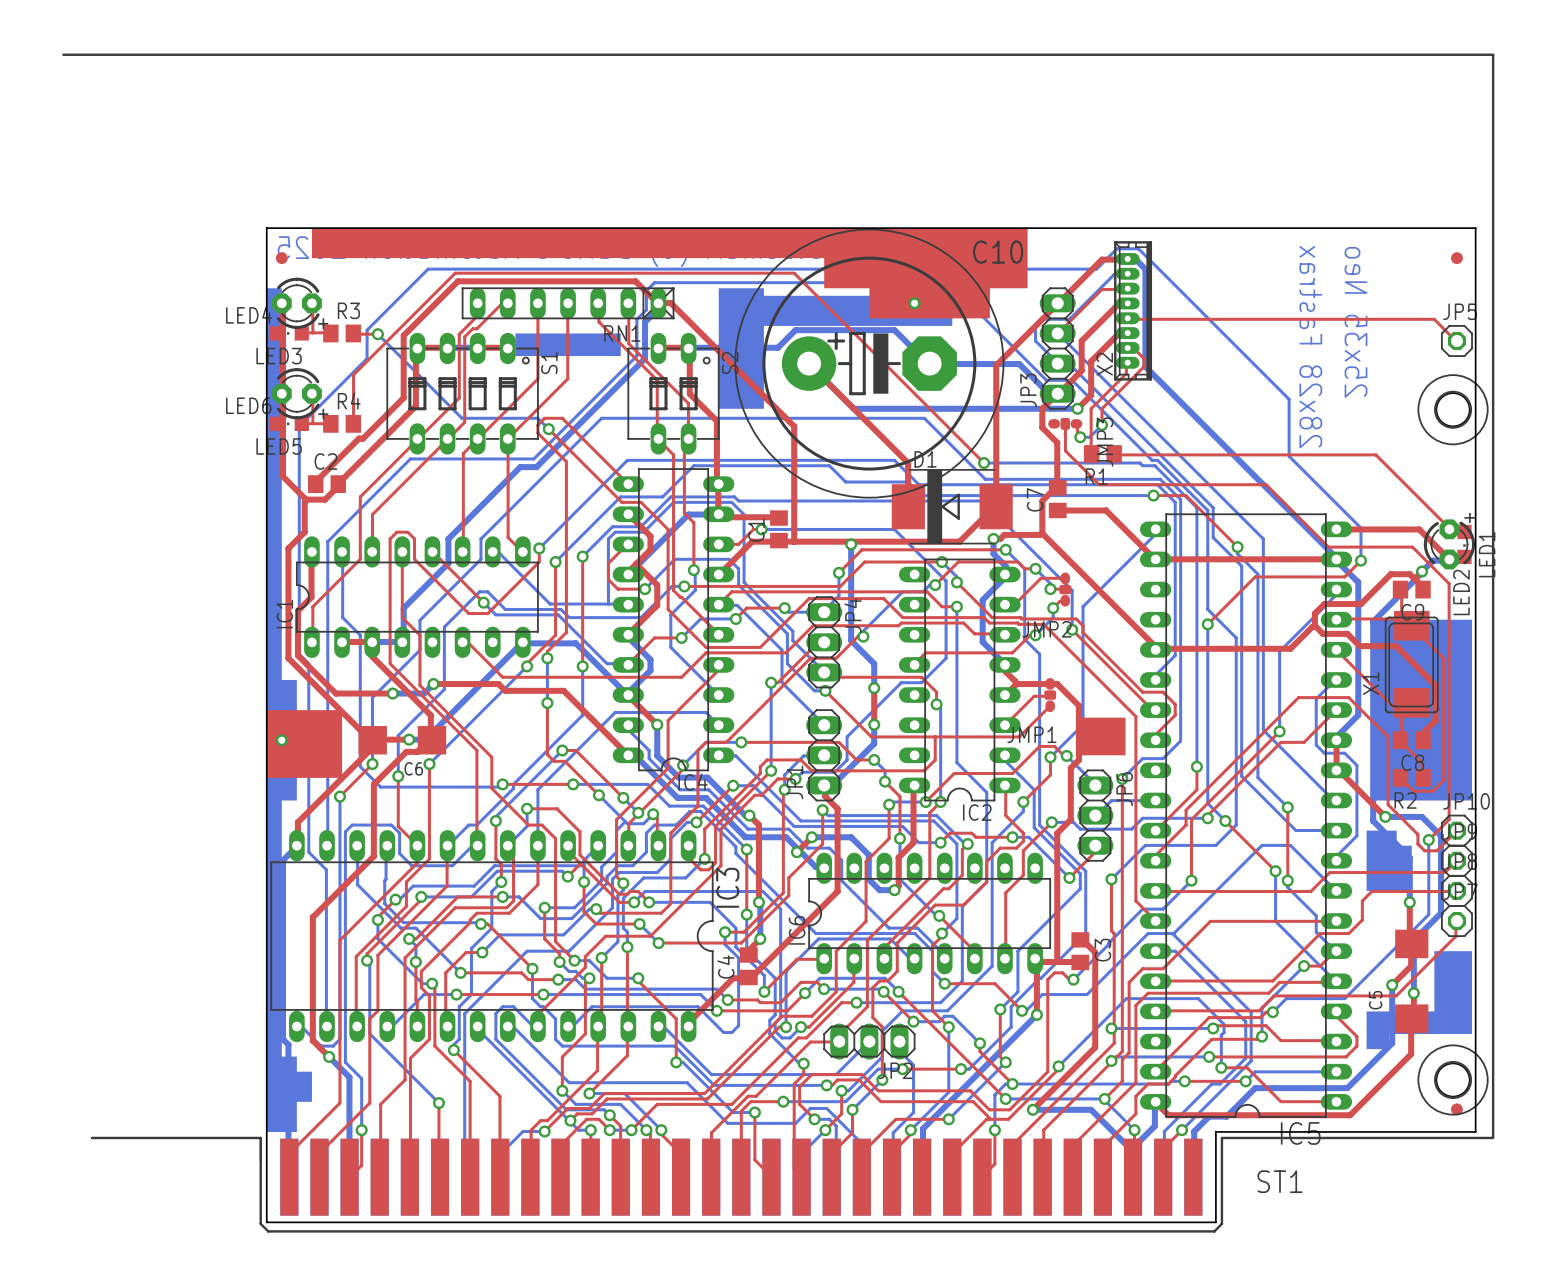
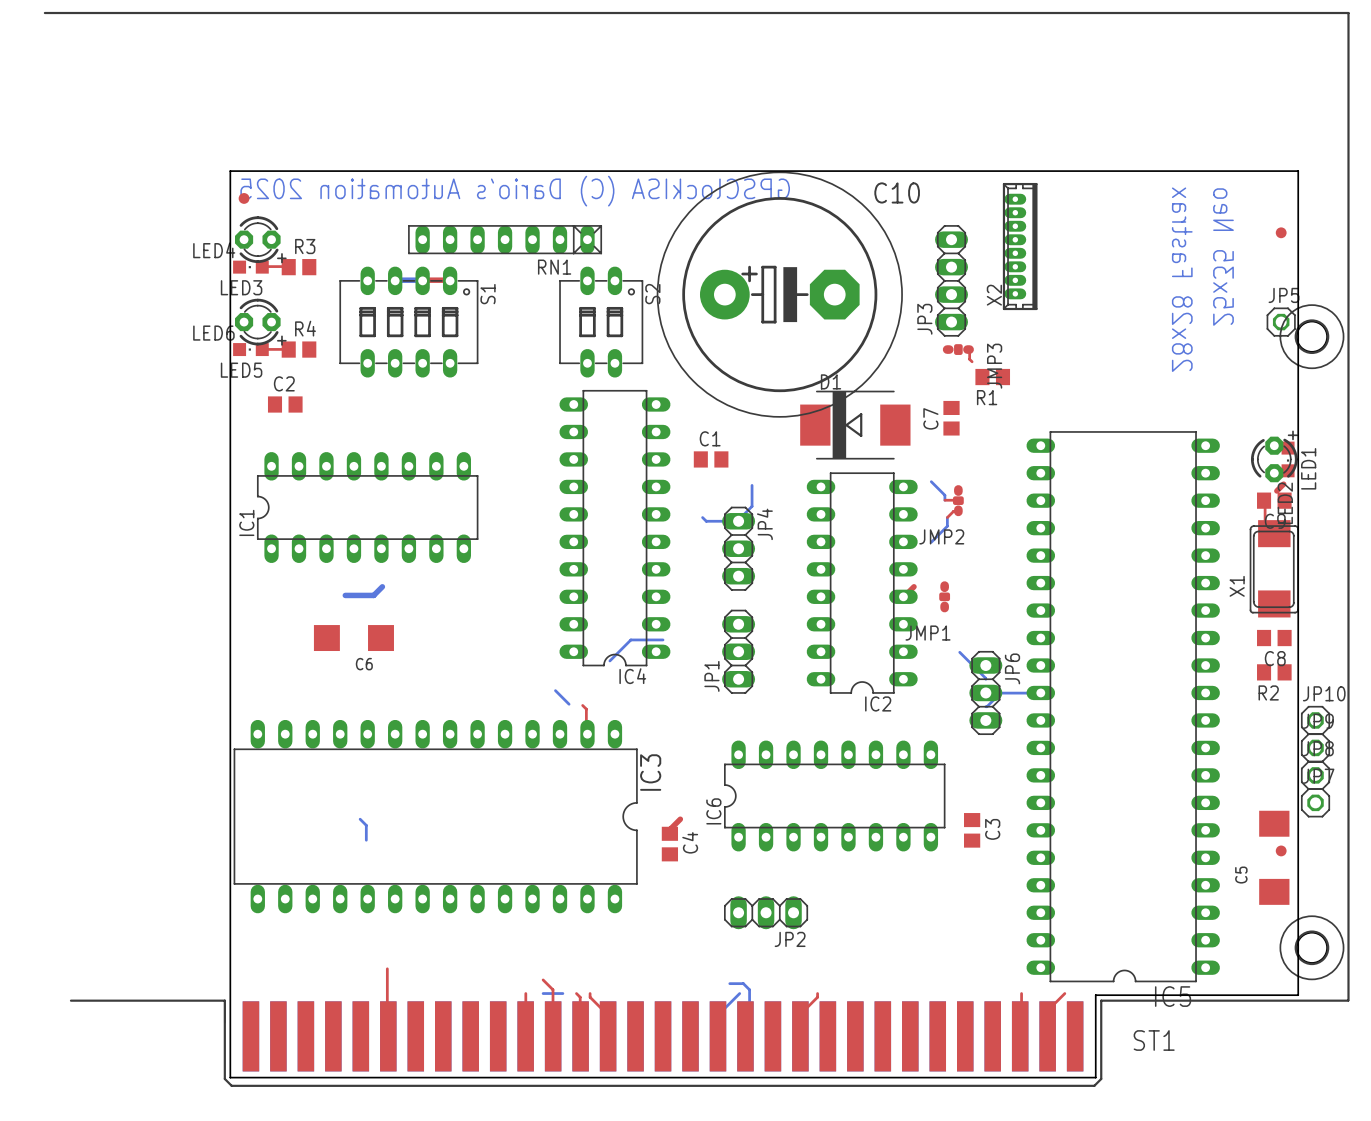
drawing: [311, 228, 1028, 409] -> none
board edge: (1437, 228) (1475, 228) (1475, 1131) (1437, 1131) -> (1298, 171) (1298, 995)
top track: (1127, 258) (1102, 259) (996, 365) (996, 506) (959, 541) (752, 541) (718, 574) -> none
bottom track: (1127, 258) (1135, 259) (1145, 269) (1145, 366) (1335, 556) (1336, 560) (1358, 582) (1358, 715) (1336, 736) (1336, 740) -> none
part position: (1456, 258) -> (1281, 232)
bottom track: (1127, 273) (1114, 274) (1069, 319) (1043, 319) (1035, 327) (1035, 340) (1057, 363) (1069, 364) (1213, 507) (1213, 537) (1241, 566) (1241, 776) (1295, 830) (1336, 830) -> none
drawing: [266, 288, 343, 1132] -> none
top track: (1127, 288) (1102, 289) (1057, 333) -> none
top track: (281, 303) (283, 476) (306, 499) -> none
top track: (311, 303) (312, 332) -> none
top track: (477, 303) (476, 316) (459, 334) (459, 397) (360, 496) (360, 559) (312, 606) (311, 642) -> none
top track: (507, 303) (501, 304) (476, 328) (472, 328) (464, 336) (464, 422) (372, 514) (372, 551) -> none
top track: (537, 303) (537, 378) (463, 453) (462, 551) -> none
top track: (568, 303) (567, 378) (507, 438) (508, 537) (522, 551) -> none
top track: (598, 303) (598, 322) (657, 380) (657, 438) (673, 454) (673, 590) (718, 634) -> none
top track: (628, 303) (628, 343) (688, 403) (688, 438) (684, 444) (684, 513) (693, 522) (693, 570) -> none
bottom track: (658, 303) (657, 309) (645, 322) (645, 358) (536, 467) (520, 467) (448, 538) (448, 563) (403, 608) (402, 642) (372, 642) -> none
via: (914, 303) -> none
top track: (1127, 303) (1118, 304) (1081, 340) (1081, 370) (1042, 408) (1042, 427) (1057, 442) (1057, 487) (1042, 500) (1042, 533) -> none
top track: (1127, 318) (1434, 319) (1456, 340) -> none
top track: (353, 333) (377, 334) -> none
drawing: [515, 333, 621, 357] -> none
bottom track: (1057, 333) (1263, 538) (1263, 730) (1332, 799) (1336, 800) -> none
top track: (1127, 333) (1118, 334) (1091, 361) (1091, 395) (1077, 408) -> none
bottom track: (377, 334) (462, 418) (537, 418) (548, 429) -> none
via: (377, 334) -> none
JP5 position: (1456, 340) -> (1281, 322)
top track: (1127, 347) (1134, 349) (1144, 358) (1144, 366) (1102, 408) (1102, 425) -> none
top track: (447, 348) (417, 348) (415, 406) (337, 484) (337, 487) (325, 499) (306, 499) -> none
top track: (658, 348) (688, 347) (689, 393) (716, 420) (718, 514) (722, 517) (778, 518) -> none
bottom track: (688, 348) (777, 347) (795, 330) (894, 330) (929, 364) (1019, 364) (1047, 392) (1057, 393) -> none
top track: (1127, 362) (1126, 373) (1091, 408) (1091, 453) -> none
top track: (809, 363) (908, 463) (908, 506) -> none
bottom track: (809, 363) (853, 408) (1077, 408) -> none
top track: (311, 393) (312, 423) -> none
via: (1077, 408) -> none
top track: (353, 423) (353, 374) (455, 273) (794, 273) (984, 463) -> none
top track: (1065, 423) (1065, 450) (1099, 484) (1266, 484) (1328, 547) (1412, 547) (1449, 583) (1449, 819) (1428, 839) -> none
bottom track: (1102, 425) (1089, 437) (1080, 437) -> none
via: (1102, 425) -> none
top track: (548, 429) (622, 502) (640, 502) (668, 529) (668, 609) (706, 647) (760, 647) (809, 598) (883, 598) (902, 617) (984, 617) (989, 623) (1043, 624) (1135, 716) (1135, 901) (1155, 921) -> none
via: (548, 429) -> none
via: (1080, 437) -> none
top track: (1114, 453) (1375, 454) (1449, 529) -> none
bottom track: (984, 463) (1139, 463) (1142, 465) (1154, 465) (1196, 507) (1196, 766) -> none
via: (984, 463) -> none
top track: (315, 484) (316, 480) (358, 438) (363, 438) (403, 397) (403, 335) (457, 281) (635, 281) (657, 303) (670, 303) (794, 426) (794, 541) -> none
top track: (628, 484) (562, 418) (544, 418) (537, 425) (537, 433) (566, 461) (566, 632) (547, 651) (547, 658) -> none
top track: (1153, 495) (1186, 495) (1237, 547) -> none
bottom track: (1153, 495) (921, 495) (908, 482) (845, 482) (829, 465) (693, 465) (662, 496) (620, 496) (555, 562) -> none
via: (1153, 495) -> none
top track: (306, 499) (304, 532) (288, 548) (288, 658) (369, 739) (372, 740) -> none
top track: (1057, 510) (1106, 510) (1155, 559) (1336, 559) -> none
top track: (628, 514) (650, 536) (650, 549) (628, 571) (628, 574) -> none
bottom track: (718, 514) (688, 514) (628, 574) -> none
top track: (761, 529) (753, 529) (738, 544) (718, 544) -> none
bottom track: (761, 529) (894, 529) (946, 581) (946, 658) (921, 682) (901, 682) (847, 736) (847, 759) (834, 772) (802, 772) (795, 778) -> none
via: (761, 529) -> none
C1 rotation: 0° (778, 529) -> 90° clockwise (711, 459)
bottom track: (1155, 529) (1154, 534) (1083, 606) (1083, 724) (1050, 757) -> none
top track: (1336, 529) (1419, 529) (1449, 559) -> none
top track: (1042, 533) (1154, 646) (1155, 649) (1290, 648) (1314, 625) -> none
top track: (1042, 533) (1004, 534) (1000, 538) (993, 538) -> none
bottom track: (993, 538) (993, 553) (1005, 566) (1005, 571) (1004, 578) (982, 599) (982, 642) (1004, 664) -> none
via: (993, 538) -> none
LED2 position: (1449, 541) -> (1274, 456)
top track: (628, 544) (608, 563) (608, 579) (617, 589) (645, 589) -> none
bottom track: (851, 544) (851, 640) (874, 663) (874, 688) -> none
via: (851, 544) -> none
LED1 position: (1464, 544) -> (1288, 459)
bottom track: (1237, 547) (1237, 553) (1257, 574) (1257, 777) (1287, 807) -> none
via: (1237, 547) -> none
top track: (539, 548) (539, 562) (487, 613) (468, 613) (414, 559) (414, 538) (407, 532) (396, 532) (390, 538) (390, 663) (476, 750) (477, 845) -> none
bottom track: (539, 548) (627, 460) (894, 460) (918, 484) (1157, 484) (1175, 502) (1175, 655) (1156, 674) (1155, 679) -> none
via: (539, 548) -> none
top track: (1005, 549) (862, 549) (838, 572) -> none
bottom track: (1005, 549) (1024, 568) (1024, 639) (1039, 654) (1039, 825) (1085, 871) (1085, 933) (1011, 1006) (1011, 1027) (969, 1069) (960, 1069) -> none
via: (1005, 549) -> none
top track: (311, 551) (311, 597) (297, 610) (297, 655) (335, 693) (392, 693) -> none
bottom track: (342, 551) (342, 617) (360, 635) (360, 766) (380, 787) (499, 787) (502, 784) -> none
top track: (402, 551) (402, 617) (419, 635) (419, 685) (491, 757) (491, 788) (528, 825) (542, 825) (555, 838) (555, 941) (574, 960) -> none
top track: (432, 551) (483, 602) -> none
bottom track: (492, 551) (498, 552) (550, 604) (628, 604) -> none
top track: (582, 556) (582, 666) -> none
bottom track: (582, 556) (612, 526) (640, 526) (670, 496) (734, 496) (738, 500) (982, 500) (1072, 590) (1072, 629) -> none
via: (582, 556) -> none
bottom track: (1449, 559) (1432, 560) (1373, 621) (1373, 821) (1409, 857) (1409, 902) -> none
top track: (1360, 560) (1344, 576) (1255, 576) (1207, 624) -> none
bottom track: (1360, 560) (1360, 528) (1289, 456) (1289, 399) (1138, 248) (1116, 248) (1096, 269) (428, 269) (367, 330) (367, 358) (299, 426) (299, 654) (308, 663) (308, 852) (326, 869) (327, 1026) -> none
via: (1360, 560) -> none
top track: (555, 562) (555, 635) (527, 663) (527, 666) -> none
via: (555, 562) -> none
top track: (942, 562) (864, 562) (840, 586) (684, 586) -> none
bottom track: (942, 562) (956, 576) (956, 582) -> none
via: (942, 562) -> none
top track: (636, 564) (657, 585) (657, 605) (628, 634) -> none
top track: (1035, 568) (1024, 568) (1017, 562) (958, 562) (935, 585) -> none
via: (1035, 568) -> none
bottom track: (693, 570) (695, 590) (670, 614) (670, 647) (718, 695) -> none
via: (693, 570) -> none
via: (1422, 571) -> none
via: (838, 572) -> none
top track: (1065, 578) (1040, 578) (1015, 604) (1004, 604) -> none
top track: (956, 582) (992, 617) (1076, 618) (1083, 625) (1083, 632) (1142, 692) (1163, 692) (1175, 704) (1175, 715) (1156, 734) (1155, 740) -> none
via: (956, 582) -> none
bottom track: (935, 585) (929, 585) (923, 591) (902, 591) (863, 631) (863, 636) -> none
via: (935, 585) -> none
bottom track: (684, 586) (672, 586) (640, 617) (569, 617) (560, 609) (505, 609) (487, 591) (479, 591) (444, 627) (444, 689) (398, 735) (398, 776) -> none
via: (684, 586) -> none
bottom track: (645, 589) (674, 559) (729, 559) (738, 568) (738, 585) (787, 633) (787, 663) (814, 690) (825, 690) -> none
via: (645, 589) -> none
via: (1050, 589) -> none
bottom track: (1336, 589) (1335, 595) (1279, 651) (1279, 731) -> none
top track: (1423, 589) (1409, 574) (1390, 574) (1360, 604) (1324, 604) (1314, 613) (1314, 625) -> none
bottom track: (483, 602) (495, 614) (558, 614) (607, 663) (628, 664) -> none
via: (483, 602) -> none
bottom track: (608, 604) (608, 538) (615, 532) (643, 532) (673, 502) (731, 502) (744, 514) (744, 582) (792, 631) (792, 640) (824, 672) -> none
top track: (718, 604) (731, 591) (927, 591) (942, 606) (956, 606) -> none
bottom track: (718, 604) (737, 605) (782, 650) (782, 682) (824, 725) -> none
bottom track: (956, 606) (956, 762) (986, 792) (986, 882) (962, 906) (962, 981) (940, 1002) (856, 1002) -> none
via: (956, 606) -> none
top track: (784, 608) (746, 608) (735, 618) -> none
via: (784, 608) -> none
via: (1053, 608) -> none
bottom track: (735, 618) (700, 618) (681, 637) -> none
via: (735, 618) -> none
IC4 position: (673, 619) -> (614, 528)
top track: (1336, 619) (1396, 618) (1400, 614) (1443, 658) (1443, 780) (1432, 791) (1413, 791) (1400, 777) -> none
drawing: [1374, 619, 1473, 801] -> none
bottom track: (1207, 624) (1207, 803) (1225, 821) -> none
via: (1207, 624) -> none
top track: (1314, 625) (1323, 633) (1347, 633) (1359, 646) (1396, 646) (1435, 685) (1435, 720) (1423, 732) (1423, 740) -> none
top track: (1072, 629) (1152, 709) (1155, 710) -> none
via: (1072, 629) -> none
bottom track: (628, 634) (628, 637) (650, 659) (650, 670) (628, 692) (628, 695) (575, 643) (522, 642) (425, 739) (409, 739) -> none
top track: (1004, 634) (974, 633) (963, 623) (901, 623) (898, 625) (813, 625) (786, 652) (706, 652) (681, 677) (502, 677) (468, 643) (462, 642) -> none
top track: (1035, 635) (1030, 635) (1012, 652) (925, 652) (914, 664) -> none
via: (1035, 635) -> none
top track: (863, 636) (857, 636) (836, 658) (810, 658) (726, 742) (706, 742) (697, 750) (697, 806) (670, 833) (670, 903) (661, 913) (600, 913) (596, 909) -> none
via: (863, 636) -> none
top track: (681, 637) (654, 637) (628, 664) -> none
via: (681, 637) -> none
top track: (342, 642) (372, 642) (372, 656) (430, 715) (431, 740) (428, 741) (417, 751) (406, 751) (373, 784) (373, 856) (312, 917) (312, 1040) (329, 1056) -> none
top track: (824, 642) (817, 643) (777, 682) (771, 682) -> none
top track: (1336, 649) (1400, 713) (1411, 702) (1401, 712) (1401, 739) (1400, 741) (1422, 762) (1423, 777) -> none
bottom track: (547, 658) (547, 703) -> none
via: (547, 658) -> none
top track: (718, 664) (718, 670) (668, 720) (668, 768) (616, 819) (616, 876) (623, 883) -> none
top track: (1004, 664) (1005, 671) (1016, 684) (1057, 684) (1078, 705) (1078, 759) (1070, 768) (1070, 819) (1057, 833) (1057, 962) -> none
bottom track: (527, 666) (429, 764) -> none
via: (527, 666) -> none
bottom track: (582, 666) (582, 715) (513, 784) (513, 788) (476, 825) (468, 825) (447, 845) -> none
via: (582, 666) -> none
top track: (824, 672) (829, 677) (921, 677) (936, 692) (936, 704) -> none
bottom track: (1336, 679) (1316, 698) (1316, 745) (1324, 753) (1344, 753) (1356, 765) (1356, 835) (1336, 856) (1336, 860) -> none
bottom track: (771, 682) (771, 770) -> none
via: (771, 682) -> none
top track: (433, 684) (498, 684) (505, 690) (563, 690) (628, 755) -> none
via: (433, 684) -> none
top track: (874, 688) (874, 724) -> none
via: (874, 688) -> none
top track: (825, 690) (871, 736) (1019, 736) (1050, 706) -> none
via: (825, 690) -> none
via: (392, 693) -> none
top track: (628, 695) (657, 724) -> none
top track: (1050, 695) (1034, 696) (1004, 725) -> none
top track: (547, 703) (547, 754) (554, 761) (565, 761) (598, 795) -> none
via: (547, 703) -> none
bottom track: (936, 704) (940, 708) (940, 802) -> none
via: (936, 704) -> none
top track: (1336, 710) (1304, 742) (1280, 742) (1207, 815) (1207, 818) -> none
drawing: [1080, 717, 1126, 756] -> none
bottom track: (657, 724) (657, 755) (678, 777) (707, 777) (745, 815) (749, 815) -> none
via: (657, 724) -> none
bottom track: (874, 724) (874, 743) (833, 784) (824, 785) -> none
via: (874, 724) -> none
bottom track: (628, 725) (628, 730) (649, 750) (649, 758) (680, 789) (708, 789) (748, 829) (788, 829) (807, 848) (829, 848) (841, 860) (841, 880) (889, 928) (917, 928) (944, 955) (944, 958) -> none
bottom track: (718, 725) (706, 712) (615, 712) (537, 789) (537, 845) -> none
top track: (1279, 731) (1191, 819) (1191, 880) -> none
via: (1279, 731) -> none
top track: (935, 736) (935, 759) (924, 770) (811, 770) (800, 759) (767, 759) (760, 766) (760, 773) (704, 829) (704, 858) -> none
top track: (409, 739) (372, 740) -> none
via: (409, 739) -> none
via: (281, 740) -> none
top track: (372, 740) (372, 747) (297, 822) (296, 845) -> none
top track: (1336, 740) (1336, 770) (1339, 770) (1385, 816) -> none
top track: (741, 742) (838, 742) (856, 759) (874, 759) -> none
via: (741, 742) -> none
top track: (562, 750) (575, 750) (623, 797) -> none
bottom track: (562, 750) (495, 816) (495, 821) -> none
via: (562, 750) -> none
bottom track: (628, 755) (635, 755) (677, 797) (706, 797) (745, 837) (786, 837) (815, 867) (824, 868) -> none
bottom track: (718, 755) (735, 755) (800, 821) (933, 821) (956, 844) (956, 918) (942, 933) -> none
bottom track: (824, 755) (803, 755) (784, 774) (784, 789) -> none
bottom track: (1004, 755) (1005, 761) (1034, 789) (1034, 827) (1080, 873) (1080, 888) (1017, 951) (1017, 991) (1000, 1009) -> none
top track: (1066, 755) (1064, 755) (1054, 746) (1039, 746) (1012, 773) (954, 773) (925, 802) -> none
via: (1066, 755) -> none
top track: (1050, 757) (1050, 774) (1023, 802) -> none
via: (1050, 757) -> none
bottom track: (874, 759) (885, 770) (885, 781) -> none
via: (874, 759) -> none
top track: (372, 764) (339, 796) -> none
bottom track: (372, 764) (372, 697) (419, 650) (419, 620) (480, 559) (480, 538) (601, 418) (924, 418) (985, 479) (1160, 479) (1180, 499) (1180, 741) (1163, 758) (1142, 758) (1122, 778) -> none
via: (372, 764) -> none
top track: (429, 764) (429, 858) (406, 882) (406, 906) (356, 956) (357, 1026) -> none
via: (429, 764) -> none
top track: (683, 765) (683, 769) (628, 823) (628, 845) -> none
via: (683, 765) -> none
top track: (1196, 766) (1196, 789) (1155, 830) -> none
via: (1196, 766) -> none
top track: (771, 770) (715, 826) (715, 863) (708, 869) (700, 869) (689, 858) (688, 845) -> none
via: (771, 770) -> none
top track: (398, 776) (398, 826) (417, 845) (417, 863) (339, 940) (339, 1103) (289, 1153) (289, 1177) -> none
via: (398, 776) -> none
top track: (795, 778) (777, 778) (761, 795) (754, 795) (720, 829) (720, 865) (650, 936) (605, 936) (585, 956) (585, 967) (537, 1014) (537, 1026) -> none
via: (795, 778) -> none
top track: (1122, 778) (1122, 1051) (1043, 1130) (1042, 1177) -> none
via: (1122, 778) -> none
top track: (885, 781) (899, 796) (899, 838) -> none
via: (885, 781) -> none
top track: (502, 784) (573, 784) -> none
via: (502, 784) -> none
bottom track: (573, 784) (647, 784) (669, 806) (703, 806) (746, 849) -> none
via: (573, 784) -> none
top track: (733, 785) (696, 822) -> none
bottom track: (733, 785) (753, 785) (794, 826) (902, 826) (918, 842) (940, 842) -> none
via: (733, 785) -> none
top track: (824, 785) (825, 796) (837, 808) (837, 891) (750, 978) (733, 978) (689, 1021) (688, 1026) -> none
top track: (914, 785) (913, 842) (898, 857) (898, 886) (894, 890) -> none
top track: (1004, 785) (1005, 815) (1023, 833) (1023, 841) (1016, 848) (1000, 848) (986, 861) (986, 882) (963, 905) (935, 905) (897, 943) (897, 971) (887, 981) (879, 981) (872, 987) (872, 1017) (882, 1027) (882, 1079) -> none
top track: (784, 789) (783, 892) (744, 932) (725, 932) -> none
via: (784, 789) -> none
bottom track: (598, 795) (627, 823) (643, 823) (653, 814) -> none
via: (598, 795) -> none
bottom track: (339, 796) (339, 1039) (333, 1046) (320, 1046) (302, 1027) (296, 1026) -> none
via: (339, 796) -> none
via: (623, 797) -> none
bottom track: (925, 802) (891, 802) (889, 804) -> none
via: (925, 802) -> none
top track: (940, 802) (929, 812) (929, 877) (867, 940) (867, 1006) (840, 1033) (838, 1042) (810, 1042) (756, 1096) (748, 1096) (711, 1132) (711, 1177) -> none
via: (940, 802) -> none
bottom track: (1023, 802) (1023, 811) (992, 842) (992, 966) (947, 1010) (902, 1010) (882, 1031) (882, 1056) (848, 1090) (841, 1090) -> none
via: (1023, 802) -> none
top track: (889, 804) (889, 838) (866, 861) (866, 921) (836, 951) (836, 991) (811, 1016) (782, 1016) (704, 1093) (604, 1093) (589, 1108) (567, 1108) (544, 1131) -> none
via: (889, 804) -> none
top track: (1287, 807) (1287, 880) -> none
via: (1287, 807) -> none
top track: (527, 808) (556, 808) (579, 831) (579, 854) (619, 894) (638, 891) (649, 902) -> none
bottom track: (527, 808) (527, 826) (507, 845) -> none
via: (527, 808) -> none
top track: (822, 810) (822, 844) (788, 877) (788, 895) (741, 943) (658, 943) -> none
bottom track: (822, 810) (828, 815) (936, 815) (965, 844) (967, 844) -> none
via: (822, 810) -> none
via: (638, 812) -> none
via: (653, 814) -> none
top track: (749, 815) (758, 825) (758, 902) -> none
via: (749, 815) -> none
JP6 position: (1095, 815) -> (985, 692)
bottom track: (1385, 816) (1422, 816) (1440, 835) (1440, 913) (1413, 940) (1413, 993) -> none
via: (1385, 816) -> none
bottom track: (1207, 818) (1142, 818) (1131, 829) (1080, 829) (1073, 822) (1051, 822) -> none
via: (1207, 818) -> none
top track: (495, 821) (495, 858) (501, 864) (501, 882) -> none
via: (495, 821) -> none
bottom track: (625, 821) (616, 830) (616, 852) (601, 867) (601, 880) (574, 907) (544, 907) -> none
top track: (1225, 821) (1275, 871) -> none
via: (1225, 821) -> none
bottom track: (696, 822) (687, 822) (670, 838) (670, 858) (657, 872) (619, 872) (612, 879) (612, 907) (569, 951) (527, 951) (464, 1013) (464, 1170) (470, 1177) -> none
via: (696, 822) -> none
top track: (1051, 822) (1023, 850) (1023, 875) (1005, 892) (1004, 958) -> none
via: (1051, 822) -> none
drawing: [1366, 830, 1412, 891] -> none
top track: (1456, 830) (1436, 850) (1424, 850) (1417, 844) (1417, 834) (1388, 804) (1388, 736) (1348, 697) (1298, 697) (1186, 810) (1186, 825) (1156, 854) (1155, 860) -> none
top track: (811, 837) (796, 852) -> none
bottom track: (811, 837) (851, 837) (868, 854) (868, 879) (879, 890) (894, 890) -> none
via: (811, 837) -> none
top track: (1012, 837) (975, 837) (971, 833) (950, 833) (940, 842) -> none
bottom track: (1012, 837) (1028, 837) (1069, 877) -> none
via: (1012, 837) -> none
bottom track: (899, 838) (899, 879) (936, 915) (939, 915) -> none
via: (899, 838) -> none
bottom track: (1428, 839) (1428, 914) (1344, 998) (1286, 998) (1272, 1012) -> none
via: (1428, 839) -> none
via: (940, 842) -> none
top track: (967, 844) (962, 849) (962, 875) (948, 888) (943, 888) (885, 947) (884, 958) -> none
via: (967, 844) -> none
bottom track: (296, 845) (283, 860) (283, 1039) (288, 1044) (289, 1177) -> none
bottom track: (327, 845) (327, 541) (410, 458) (533, 458) (636, 355) (636, 319) (646, 309) (646, 290) (654, 282) (948, 282) (1046, 380) (1072, 380) (1152, 460) (1157, 460) (1207, 510) (1207, 609) (1236, 637) (1236, 825) (1215, 845) (1145, 845) (1111, 879) -> none
bottom track: (357, 845) (357, 884) (400, 928) (415, 928) (460, 972) -> none
bottom track: (387, 845) (384, 903) (403, 922) (480, 924) -> none
top track: (447, 845) (447, 886) (377, 955) (377, 1010) (369, 1018) (369, 1103) (319, 1153) (319, 1177) -> none
bottom track: (477, 845) (471, 846) (452, 865) (411, 865) (399, 853) (399, 833) (391, 825) (352, 825) (345, 831) (345, 1062) (361, 1078) (361, 1130) -> none
top track: (507, 845) (513, 852) (513, 901) (506, 907) (455, 907) (405, 957) (405, 1079) (380, 1104) (379, 1177) -> none
top track: (537, 845) (537, 884) (509, 913) (476, 913) (470, 919) (470, 922) (421, 971) (421, 987) (429, 995) (429, 1039) (410, 1058) (409, 1177) -> none
top track: (568, 845) (569, 852) (619, 902) (634, 902) -> none
bottom track: (598, 845) (584, 860) (584, 882) -> none
top track: (1095, 845) (1095, 852) (1069, 877) -> none
top track: (746, 849) (746, 914) -> none
via: (746, 849) -> none
via: (796, 852) -> none
bottom track: (704, 858) (685, 877) (643, 877) (623, 898) (623, 928) (627, 932) (627, 947) -> none
via: (704, 858) -> none
top track: (1456, 860) (1445, 872) (1329, 872) (1310, 891) (1155, 890) -> none
top track: (580, 863) (567, 876) -> none
bottom track: (584, 865) (494, 865) (474, 886) (413, 886) (399, 899) (395, 899) -> none
bottom track: (1275, 871) (1275, 921) (1336, 981) -> none
via: (1275, 871) -> none
bottom track: (567, 876) (562, 871) (497, 871) (471, 896) (421, 896) -> none
via: (567, 876) -> none
via: (1069, 877) -> none
top track: (1111, 879) (1111, 930) (1114, 933) (1114, 1043) (1012, 1145) (1012, 1177) -> none
via: (1111, 879) -> none
bottom track: (1191, 880) (1163, 909) (1142, 909) (1073, 979) -> none
via: (1191, 880) -> none
bottom track: (1287, 880) (1287, 887) (1316, 915) (1316, 932) (1336, 951) -> none
via: (1287, 880) -> none
bottom track: (501, 882) (491, 891) (491, 928) (471, 948) (471, 994) (459, 1006) (459, 1039) (453, 1044) (453, 1050) -> none
via: (501, 882) -> none
top track: (584, 882) (584, 911) (596, 924) (639, 924) -> none
via: (584, 882) -> none
bottom track: (623, 883) (623, 890) (617, 895) (617, 941) (601, 957) -> none
via: (623, 883) -> none
via: (894, 890) -> none
bottom track: (1336, 890) (1290, 845) (1262, 845) (1173, 933) -> none
top track: (1456, 890) (1371, 891) (1362, 901) (1362, 919) (1348, 933) (1320, 933) (1272, 981) (1155, 981) -> none
top track: (421, 896) (421, 899) (367, 953) (367, 960) -> none
via: (421, 896) -> none
top track: (502, 896) (457, 896) (415, 938) (409, 938) -> none
bottom track: (502, 896) (518, 896) (540, 918) (571, 918) (607, 883) (607, 876) (617, 865) (632, 865) (646, 852) (646, 833) (654, 825) (676, 825) (689, 811) (700, 811) (735, 846) (735, 853) (815, 933) (914, 933) (932, 951) (932, 971) (944, 983) -> none
via: (502, 896) -> none
top track: (395, 899) (377, 917) (377, 919) -> none
via: (395, 899) -> none
bottom track: (634, 902) (645, 891) (763, 891) (780, 909) (780, 1017) (775, 1023) (775, 1031) (782, 1037) (790, 1037) (800, 1027) -> none
via: (634, 902) -> none
bottom track: (649, 902) (710, 902) (735, 928) (735, 947) (764, 975) (764, 991) -> none
via: (649, 902) -> none
bottom track: (758, 902) (760, 938) -> none
via: (758, 902) -> none
top track: (1409, 902) (1411, 966) (1392, 985) -> none
via: (1409, 902) -> none
top track: (544, 907) (544, 938) (559, 953) (559, 962) -> none
via: (544, 907) -> none
bottom track: (596, 909) (589, 909) (563, 934) (499, 934) (482, 952) -> none
via: (596, 909) -> none
bottom track: (746, 914) (746, 949) (775, 978) (775, 1014) (769, 1020) (769, 1033) (799, 1063) (803, 1063) -> none
via: (746, 914) -> none
top track: (939, 915) (974, 951) (974, 958) -> none
via: (939, 915) -> none
bottom track: (377, 919) (377, 938) (422, 983) (432, 983) -> none
via: (377, 919) -> none
top track: (1336, 921) (1210, 921) (1163, 968) (1142, 968) (1129, 982) (1129, 1052) (1122, 1059) (1122, 1081) (1104, 1098) -> none
top track: (1456, 921) (1455, 936) (1396, 995) (1274, 995) (1259, 1010) (1155, 1011) -> none
top track: (480, 924) (487, 924) (532, 968) -> none
via: (480, 924) -> none
bottom track: (639, 924) (658, 943) -> none
via: (639, 924) -> none
bottom track: (725, 932) (725, 944) (738, 957) (738, 1025) (731, 1032) (723, 1032) (697, 1006) (592, 1006) (573, 1025) (568, 1026) -> none
via: (725, 932) -> none
top track: (942, 933) (942, 936) (932, 945) (932, 1010) (948, 1027) -> none
via: (942, 933) -> none
bottom track: (1173, 933) (1148, 933) (1087, 994) (1042, 994) (1026, 1010) (1022, 1010) -> none
bottom track: (1173, 933) (1251, 1012) (1251, 1061) (1182, 1130) -> none
via: (409, 938) -> none
via: (760, 938) -> none
top track: (1080, 939) (1095, 952) (1095, 1047) (1032, 1109) -> none
via: (658, 943) -> none
top track: (627, 947) (627, 1055) (589, 1093) -> none
via: (627, 947) -> none
bottom track: (1155, 951) (1175, 951) (1245, 1021) (1245, 1058) (1219, 1084) (1211, 1084) (1164, 1131) (1163, 1177) -> none
top track: (1336, 951) (1320, 966) (1304, 966) -> none
drawing: [1366, 951, 1473, 1050] -> none
top track: (482, 952) (466, 952) (445, 972) (445, 1024) (447, 1026) -> none
via: (482, 952) -> none
top track: (601, 957) (601, 1023) (597, 1027) (597, 1070) (547, 1120) (540, 1120) (531, 1130) (530, 1177) -> none
via: (601, 957) -> none
top track: (824, 958) (796, 959) (764, 991) -> none
top track: (854, 958) (853, 982) (809, 1027) (800, 1027) -> none
bottom track: (914, 958) (909, 957) (890, 938) (818, 938) (786, 971) (786, 1027) -> none
bottom track: (367, 960) (369, 963) (369, 1033) (438, 1103) -> none
via: (367, 960) -> none
bottom track: (574, 960) (589, 960) (607, 978) (638, 978) -> none
via: (574, 960) -> none
top track: (415, 962) (417, 1026) -> none
via: (415, 962) -> none
bottom track: (559, 962) (569, 971) (575, 971) (582, 978) (589, 978) -> none
via: (559, 962) -> none
top track: (1080, 962) (1038, 962) (1035, 958) (1036, 964) (1036, 1014) -> none
C4 name position: C4 (725, 966) -> C4 (690, 842)
bottom track: (1304, 966) (1262, 1008) (1262, 1036) -> none
via: (1304, 966) -> none
bottom track: (532, 968) (532, 998) (555, 1018) (555, 1039) (562, 1046) (674, 1046) (714, 1085) (826, 1085) -> none
via: (532, 968) -> none
top track: (460, 972) (521, 972) (528, 979) (558, 979) -> none
via: (460, 972) -> none
top track: (589, 978) (585, 982) (585, 1033) (562, 1056) (562, 1090) -> none
via: (589, 978) -> none
top track: (638, 978) (638, 981) (676, 1018) (676, 1062) -> none
via: (638, 978) -> none
bottom track: (558, 979) (575, 979) (585, 989) (716, 989) (727, 999) -> none
via: (558, 979) -> none
top track: (1073, 979) (1069, 979) (1062, 972) (1054, 972) (1047, 979) (1047, 1071) (1009, 1109) (989, 1109) (970, 1090) (878, 1090) (862, 1074) (811, 1074) (799, 1086) (799, 1104) (814, 1119) -> none
via: (1073, 979) -> none
top track: (1336, 981) (1279, 982) (1268, 993) (1148, 993) (1135, 1005) (1135, 1082) (1073, 1145) (1072, 1177) -> none
top track: (432, 983) (434, 986) (434, 1046) (470, 1081) (470, 1177) -> none
via: (432, 983) -> none
top track: (944, 983) (994, 983) (1022, 1010) -> none
via: (944, 983) -> none
bottom track: (1392, 985) (1392, 1043) (1347, 1088) (1255, 1088) (1226, 1116) (1209, 1116) (1194, 1131) (1193, 1177) -> none
via: (1392, 985) -> none
top track: (824, 989) (817, 982) (800, 982) (780, 1002) (760, 1002) (757, 999) (727, 999) -> none
bottom track: (824, 989) (880, 989) (883, 991) -> none
via: (824, 989) -> none
via: (764, 991) -> none
top track: (883, 991) (913, 1021) -> none
via: (883, 991) -> none
top track: (898, 991) (1005, 1098) -> none
bottom track: (898, 991) (885, 978) (819, 978) (805, 993) -> none
via: (898, 991) -> none
top track: (805, 993) (787, 1010) (716, 1010) -> none
via: (805, 993) -> none
top track: (1413, 993) (1413, 1016) (1411, 1018) (1411, 1054) (1350, 1115) (1168, 1115) (1155, 1101) -> none
via: (1413, 993) -> none
top track: (456, 994) (543, 994) -> none
bottom track: (456, 994) (424, 994) (392, 1025) (387, 1026) -> none
via: (456, 994) -> none
bottom track: (543, 994) (700, 994) (716, 1010) -> none
via: (543, 994) -> none
via: (727, 999) -> none
top track: (856, 1002) (841, 1002) (806, 1037) (798, 1037) (731, 1104) (657, 1104) (631, 1130) -> none
via: (856, 1002) -> none
top track: (1000, 1009) (1000, 1056) (1005, 1062) -> none
via: (1000, 1009) -> none
via: (716, 1010) -> none
via: (1022, 1010) -> none
top track: (1336, 1011) (1336, 1016) (1356, 1036) (1356, 1046) (1346, 1056) (1209, 1056) -> none
top track: (1272, 1012) (1266, 1012) (1260, 1017) (1209, 1017) (1155, 1071) -> none
via: (1272, 1012) -> none
bottom track: (1036, 1014) (923, 1128) (922, 1177) -> none
via: (1036, 1014) -> none
bottom track: (913, 1021) (939, 1021) (944, 1016) (952, 1016) (979, 1043) -> none
via: (913, 1021) -> none
bottom track: (477, 1026) (478, 1029) (578, 1130) (590, 1130) -> none
bottom track: (507, 1026) (513, 1027) (569, 1082) (687, 1082) (727, 1123) (795, 1123) (810, 1108) (826, 1108) (860, 1142) (861, 1177) -> none
bottom track: (537, 1026) (532, 1025) (513, 1006) (502, 1006) (495, 1013) (495, 1039) (566, 1109) (604, 1109) (609, 1115) -> none
bottom track: (658, 1026) (664, 1027) (711, 1074) (836, 1074) (869, 1041) -> none
top track: (786, 1027) (779, 1027) (707, 1098) (607, 1098) (592, 1113) (577, 1113) (570, 1120) -> none
via: (786, 1027) -> none
via: (800, 1027) -> none
bottom track: (948, 1027) (948, 1092) (910, 1130) -> none
via: (948, 1027) -> none
bottom track: (1111, 1028) (1213, 1028) -> none
via: (1111, 1028) -> none
top track: (1213, 1028) (1215, 1025) (1266, 1025) (1280, 1040) (1336, 1041) -> none
via: (1213, 1028) -> none
top track: (1262, 1036) (1259, 1039) (1211, 1039) (1168, 1084) (1148, 1084) (1135, 1096) (1135, 1113) (1103, 1146) (1102, 1177) -> none
via: (1262, 1036) -> none
JP2 position: (869, 1041) -> (766, 912)
bottom track: (899, 1041) (899, 1051) (913, 1065) (913, 1112) (893, 1132) (891, 1177) -> none
top track: (979, 1043) (979, 1051) (1012, 1084) -> none
via: (979, 1043) -> none
top track: (453, 1050) (499, 1096) (500, 1177) -> none
via: (453, 1050) -> none
bottom track: (329, 1056) (349, 1077) (349, 1177) -> none
via: (329, 1056) -> none
bottom track: (1209, 1056) (1115, 1056) (1111, 1061) -> none
via: (1209, 1056) -> none
via: (1111, 1061) -> none
bottom track: (676, 1062) (683, 1062) (733, 1112) (754, 1112) -> none
via: (676, 1062) -> none
bottom track: (1005, 1062) (948, 1119) -> none
via: (1005, 1062) -> none
top track: (803, 1063) (803, 1074) (794, 1084) (794, 1169) (801, 1177) -> none
via: (803, 1063) -> none
top track: (1058, 1066) (1058, 1069) (1008, 1119) (986, 1119) (952, 1153) (952, 1177) -> none
bottom track: (1058, 1066) (1126, 998) (1198, 998) (1224, 1024) (1224, 1032) (1221, 1035) (1221, 1067) -> none
via: (1058, 1066) -> none
top track: (1221, 1067) (1247, 1067) (1280, 1101) (1336, 1101) -> none
via: (1221, 1067) -> none
top track: (902, 1069) (960, 1069) -> none
bottom track: (902, 1069) (878, 1069) (845, 1101) (783, 1101) -> none
via: (902, 1069) -> none
via: (960, 1069) -> none
bottom track: (1336, 1071) (1255, 1071) (1245, 1081) -> none
bottom track: (882, 1079) (852, 1109) -> none
via: (882, 1079) -> none
top track: (1184, 1081) (1245, 1081) -> none
bottom track: (1184, 1081) (1171, 1081) (1168, 1084) (1005, 1084) (994, 1094) (994, 1130) -> none
via: (1184, 1081) -> none
via: (1245, 1081) -> none
via: (1012, 1084) -> none
top track: (826, 1085) (832, 1085) (837, 1079) (859, 1079) (880, 1101) (973, 1101) (989, 1119) -> none
via: (826, 1085) -> none
bottom track: (562, 1090) (575, 1104) (620, 1104) (646, 1130) -> none
via: (562, 1090) -> none
top track: (841, 1090) (841, 1113) (825, 1130) -> none
via: (841, 1090) -> none
bottom track: (589, 1093) (624, 1093) (661, 1130) -> none
via: (589, 1093) -> none
bottom track: (1005, 1098) (1104, 1098) -> none
via: (1005, 1098) -> none
bottom track: (1103, 1098) (1134, 1130) -> none
via: (1104, 1098) -> none
top track: (783, 1101) (750, 1101) (741, 1111) (741, 1177) -> none
via: (783, 1101) -> none
bottom track: (1155, 1101) (1154, 1126) (1133, 1147) (1133, 1177) (1131, 1150) (1091, 1109) (1032, 1109) -> none
via: (438, 1103) -> none
top track: (852, 1109) (852, 1132) (832, 1153) (831, 1177) -> none
via: (852, 1109) -> none
via: (1032, 1109) -> none
part position: (1456, 1109) -> (1281, 850)
top track: (754, 1112) (754, 1159) (771, 1177) -> none
via: (754, 1112) -> none
via: (609, 1115) -> none
via: (814, 1119) -> none
top track: (948, 1119) (895, 1119) (862, 1153) (861, 1177) -> none
via: (948, 1119) -> none
via: (570, 1120) -> none
top track: (361, 1130) (361, 1165) (349, 1177) -> none
via: (361, 1130) -> none
via: (590, 1130) -> none
top track: (609, 1130) (598, 1119) (586, 1119) (560, 1145) (560, 1177) -> none
via: (609, 1130) -> none
via: (631, 1130) -> none
via: (646, 1130) -> none
via: (661, 1130) -> none
via: (825, 1130) -> none
via: (910, 1130) -> none
top track: (994, 1130) (994, 1164) (982, 1177) -> none
via: (994, 1130) -> none
via: (1134, 1130) -> none
via: (1182, 1130) -> none
bottom track: (544, 1131) (523, 1131) (501, 1153) (500, 1177) -> none
via: (544, 1131) -> none

